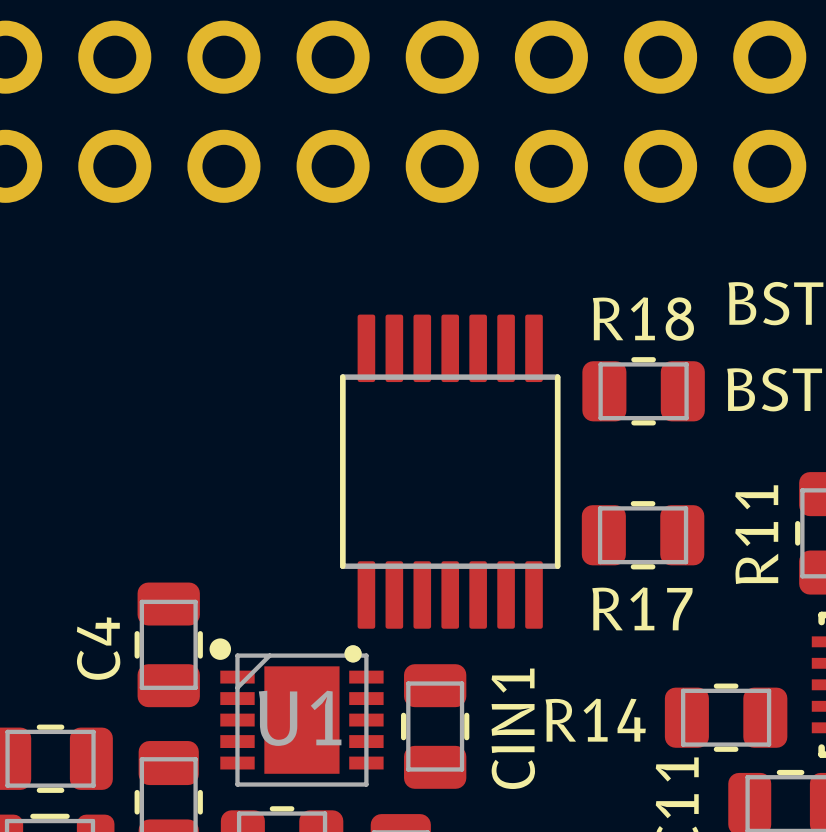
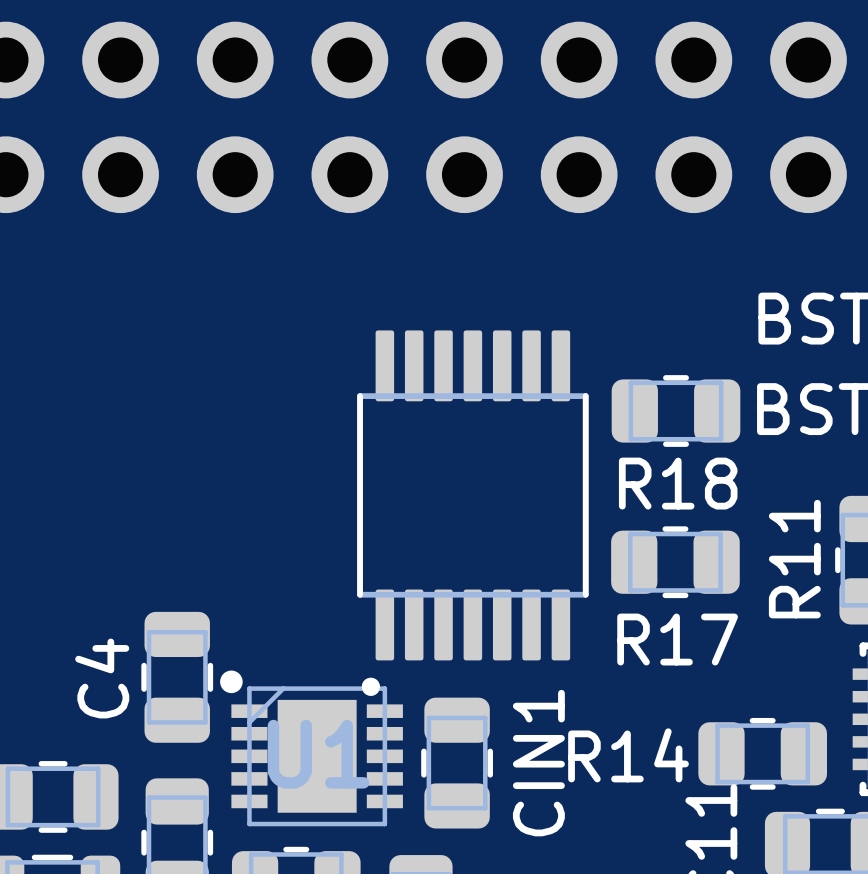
R18 name position: R18 (643, 319) -> R18 (678, 483)

